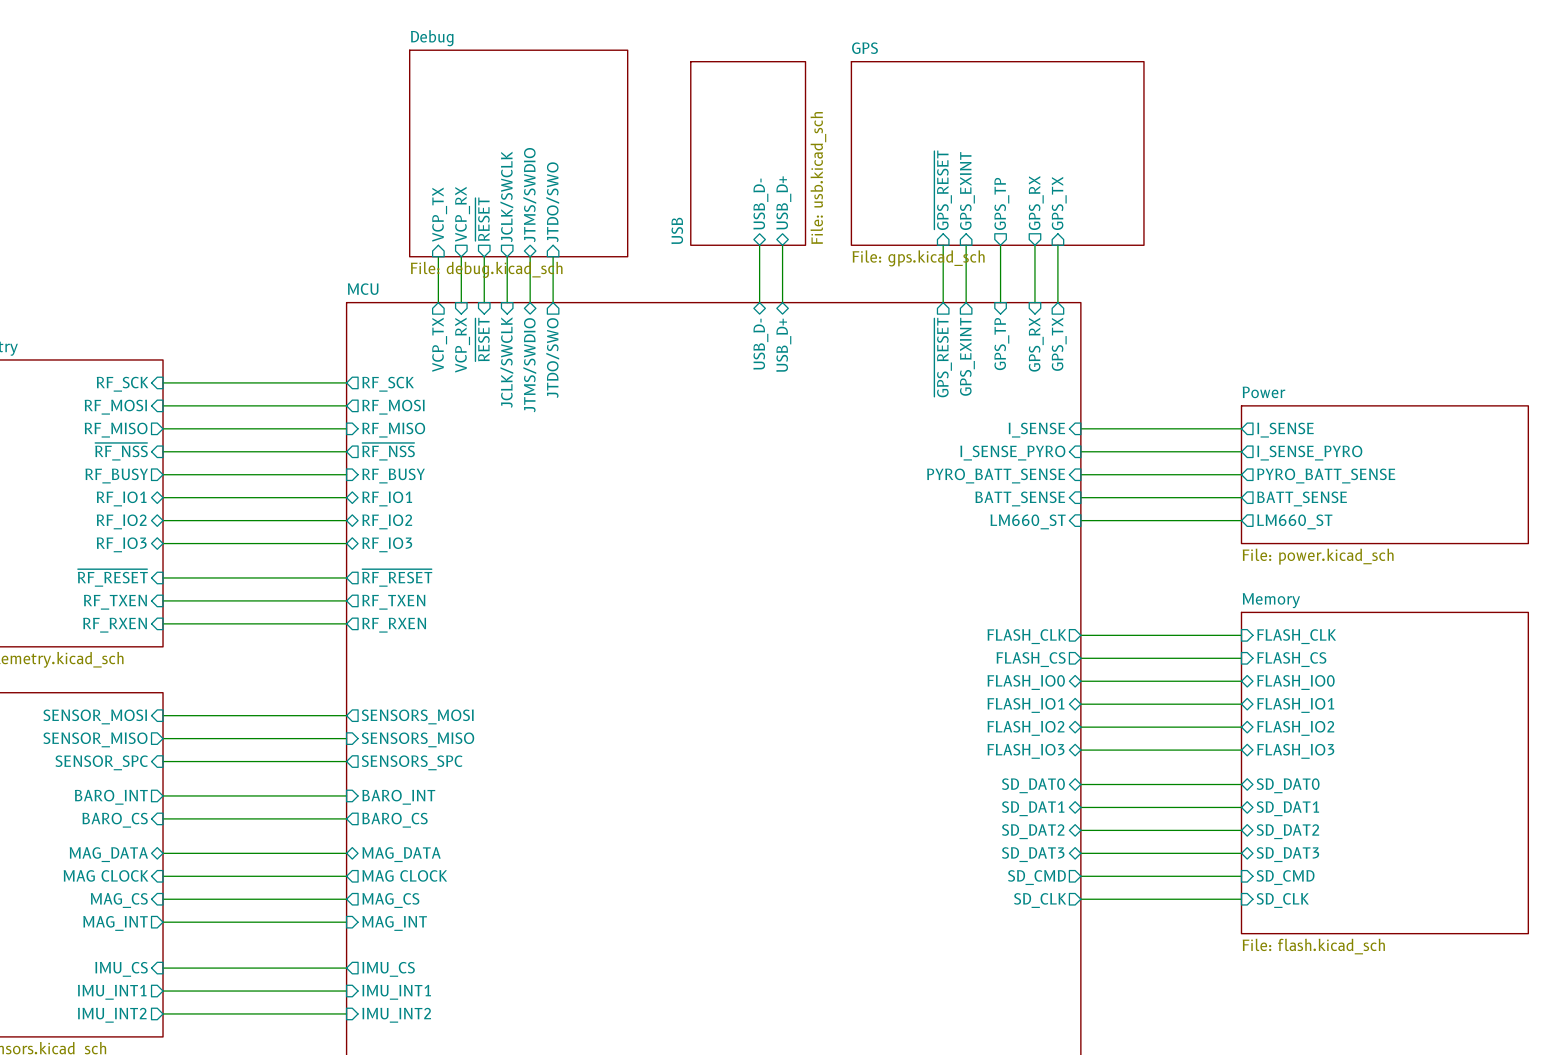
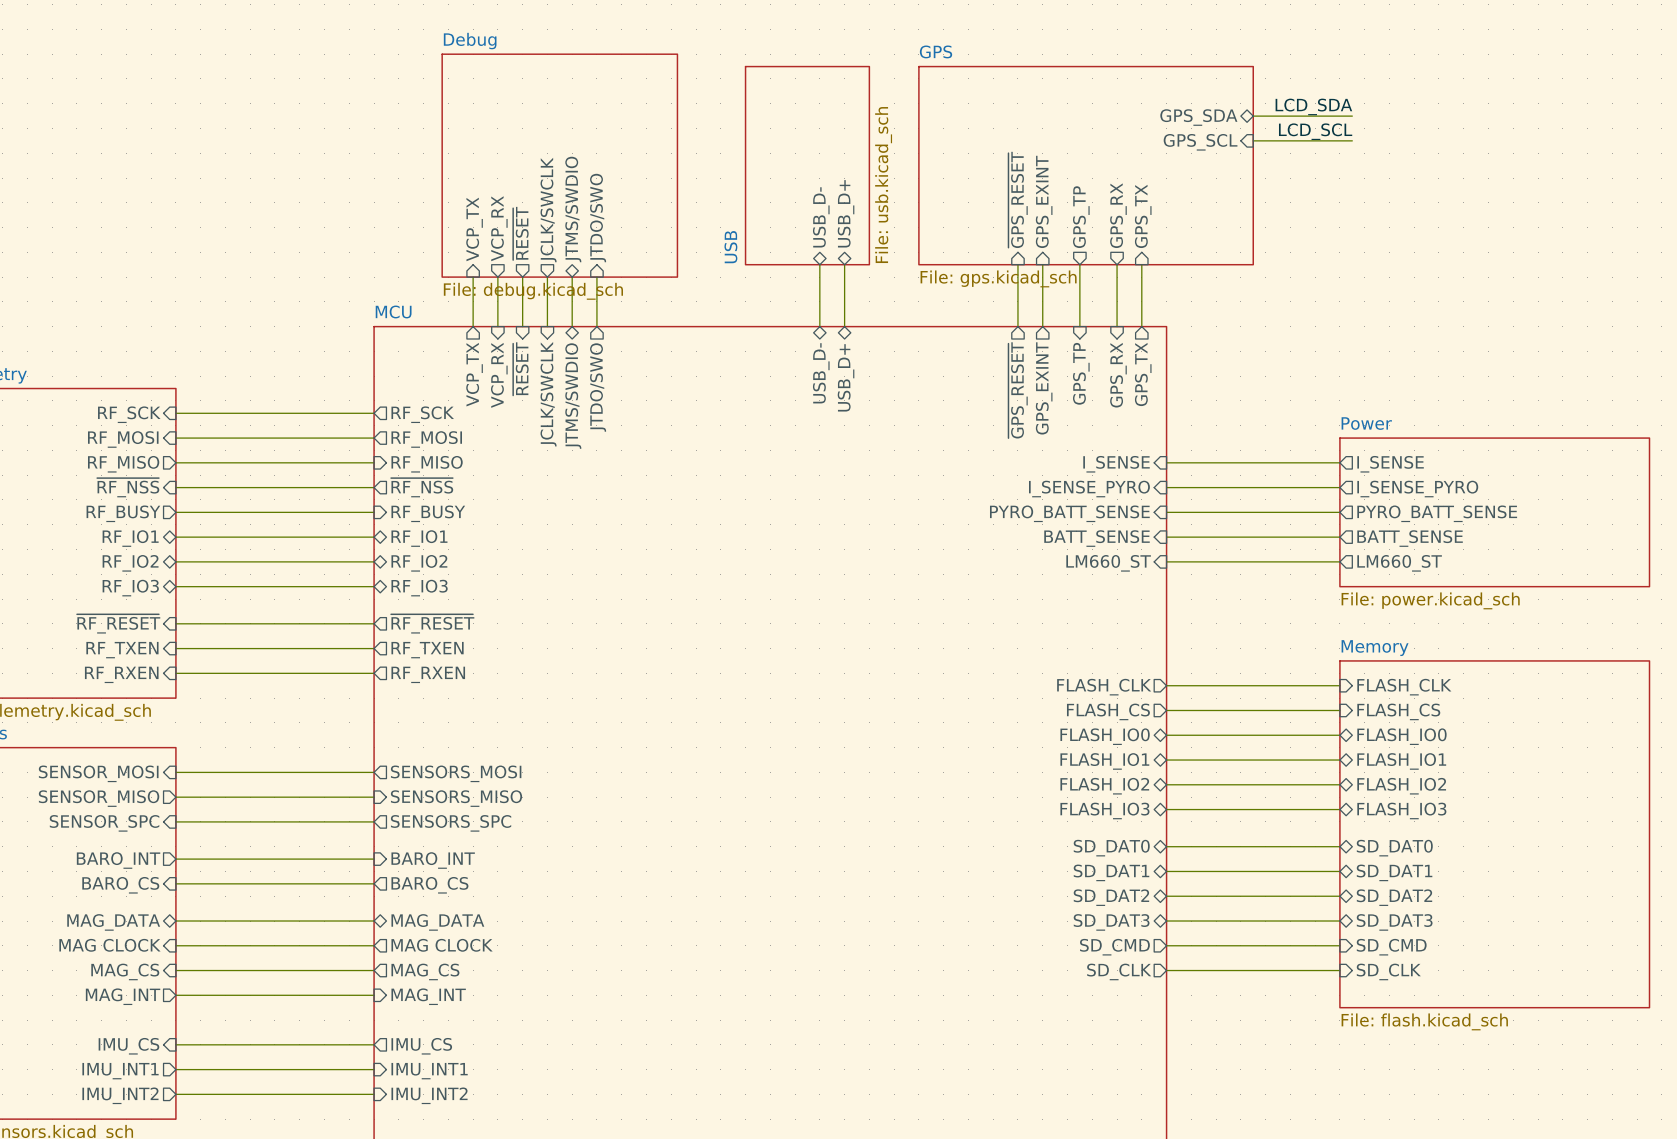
sheet GPS shape: [850, 60, 1145, 246] -> [918, 65, 1254, 266]
label: none -> LCD_SDA (1313, 106)
wire: none -> (1253, 116) (1352, 116)
sheet pin: none -> GPS_SDA (1198, 117)
label: none -> LCD_SCL (1315, 131)
wire: none -> (1253, 140) (1352, 140)
sheet pin: none -> GPS_SCL (1200, 142)

